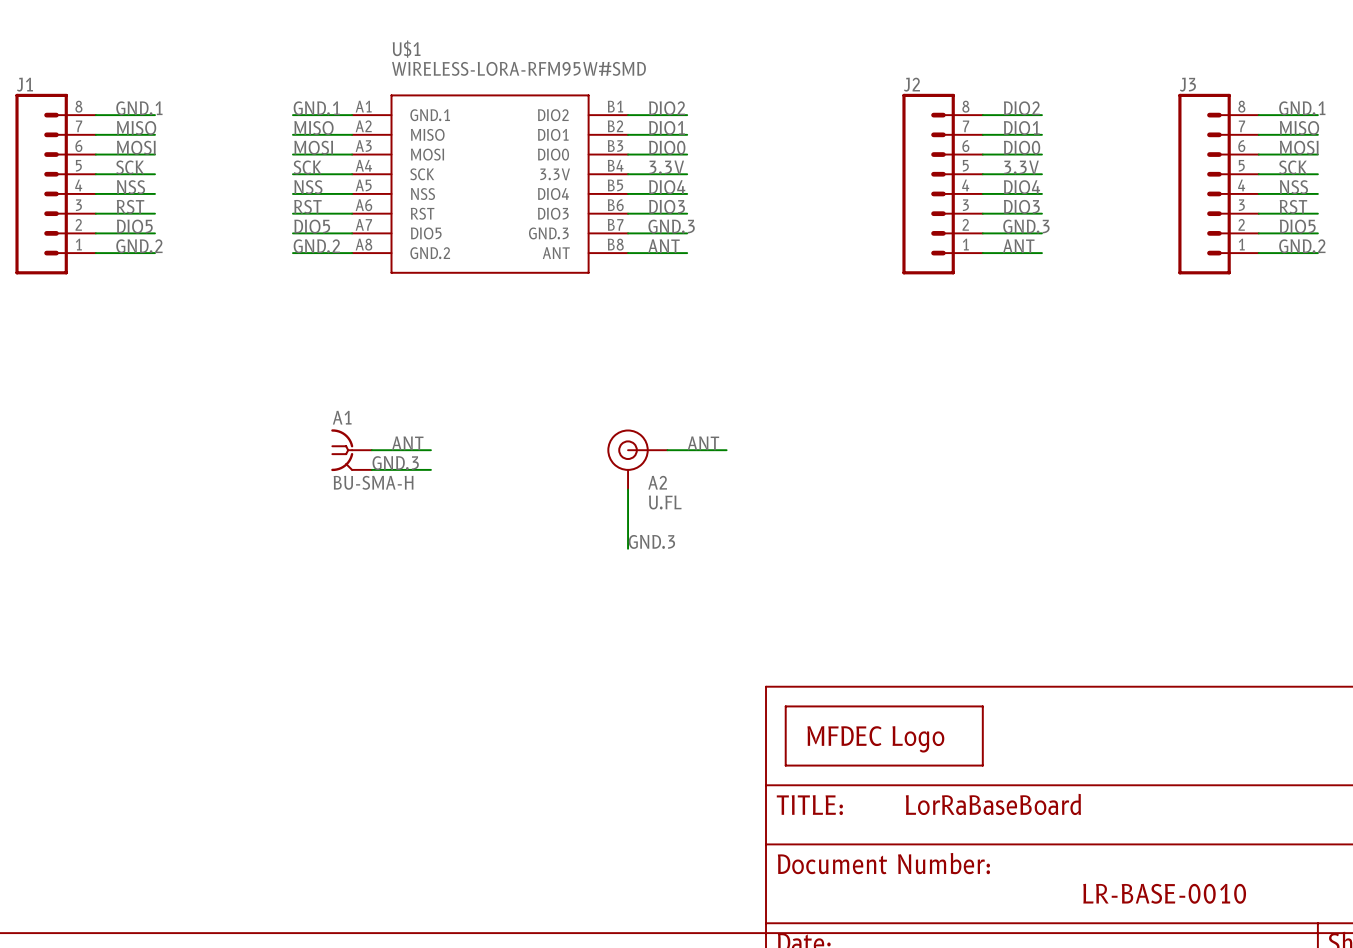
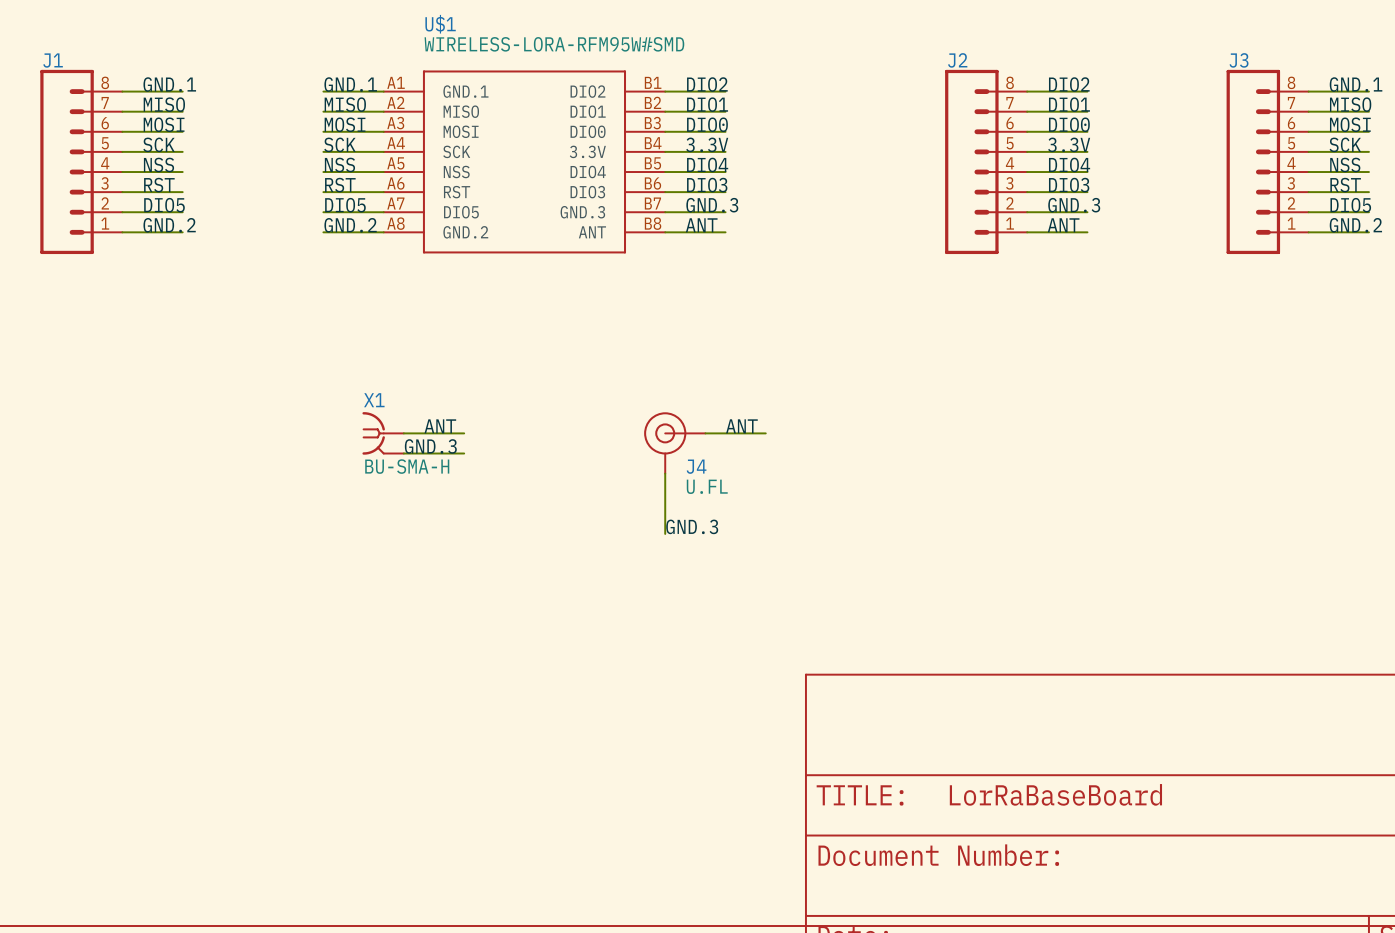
A1 name: A1 (342, 417) -> X1 (374, 400)
A2 name: A2 (657, 482) -> J4 (696, 466)
part: (884, 735) -> none
text: LR-BASE-0010 (1164, 893) -> none

